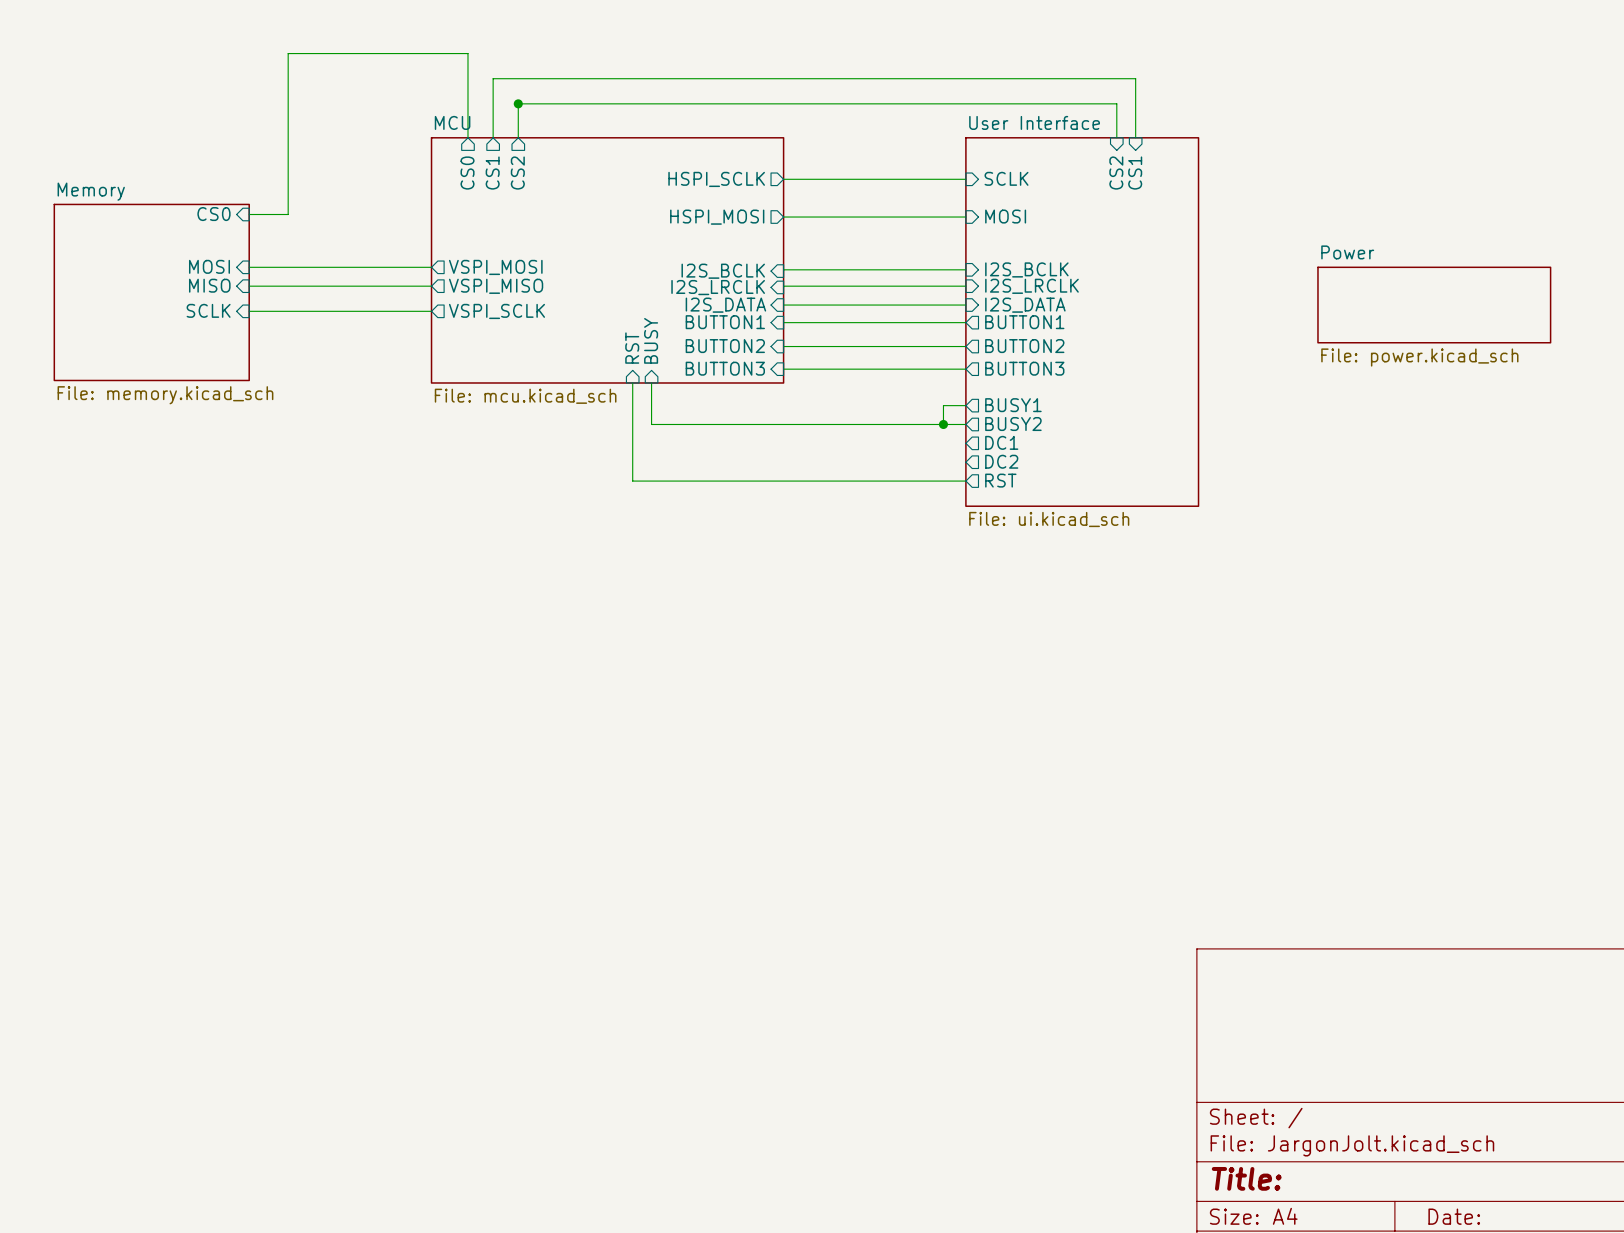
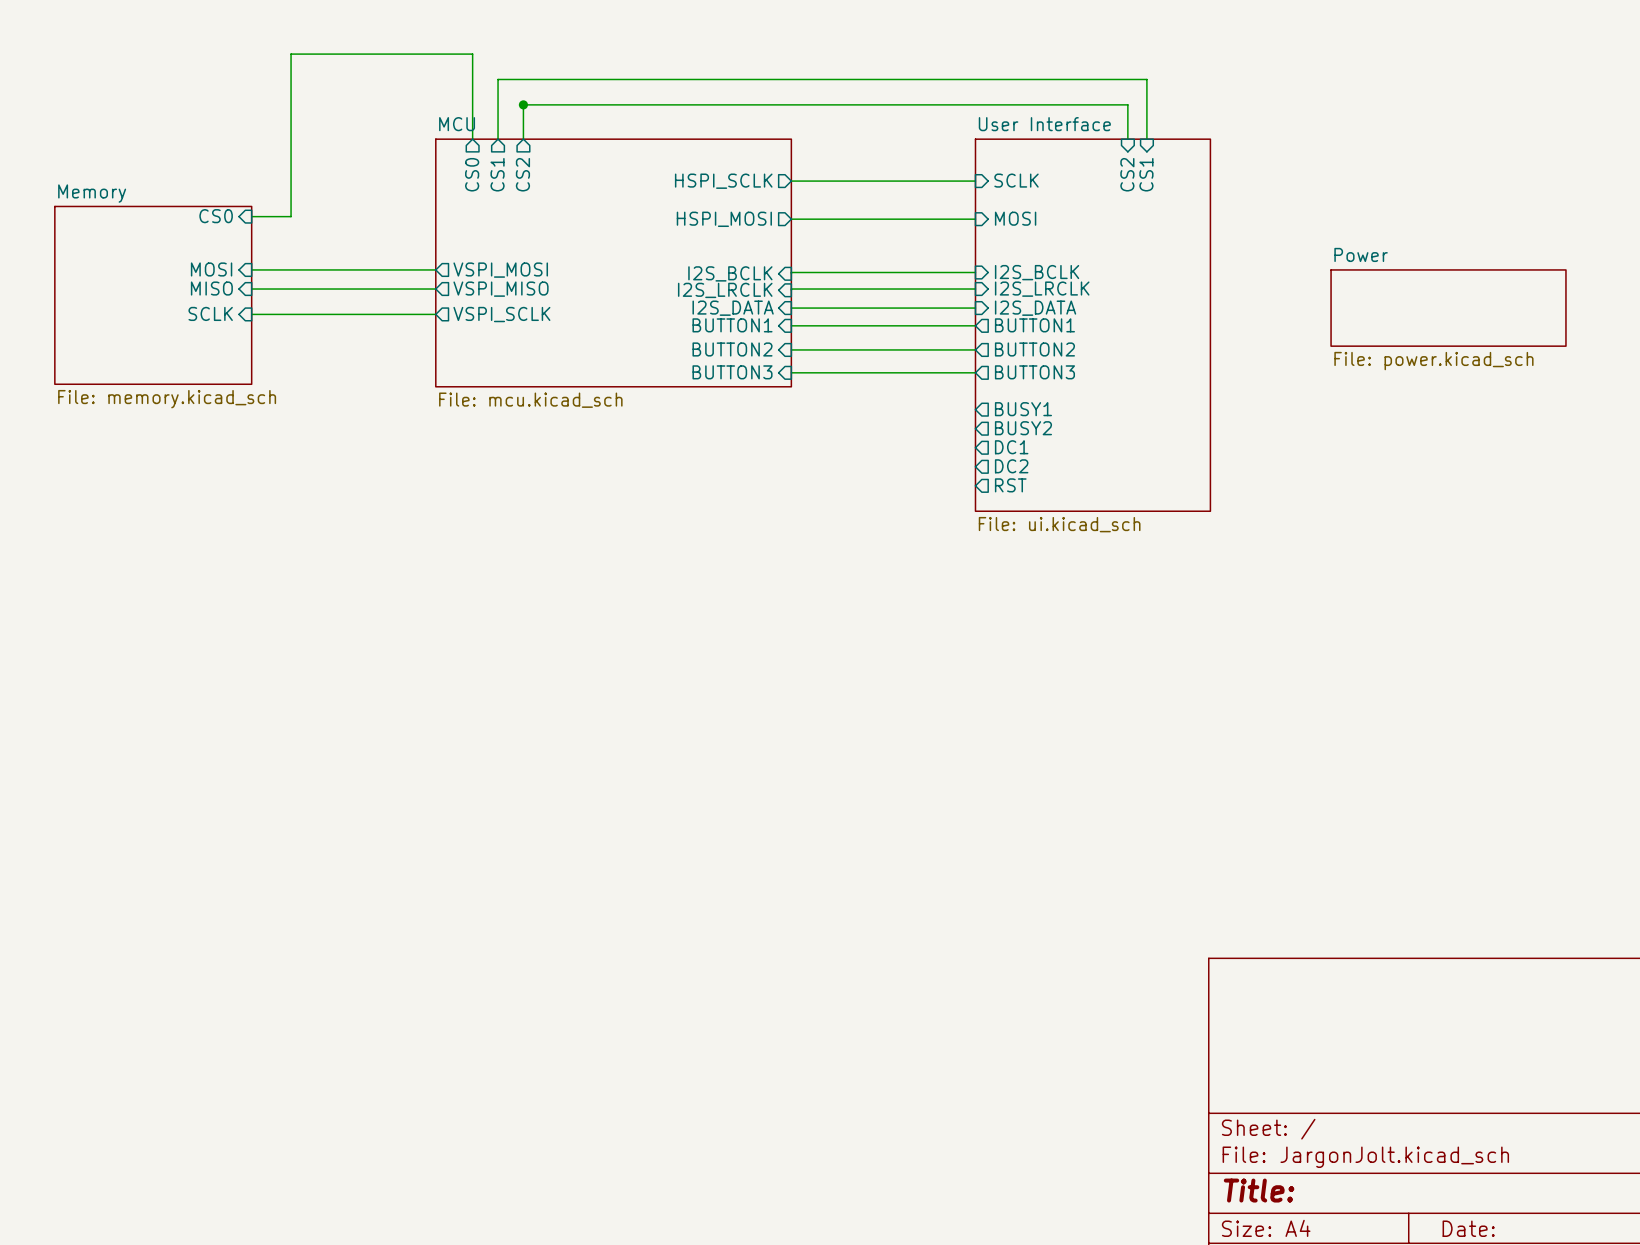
sheet pin: BUSY (651, 340) -> none
sheet pin: RST (632, 348) -> none
wire: (632, 382) (632, 481) (965, 481) -> none
wire: (651, 382) (651, 424) (965, 424) -> none
wire: (965, 405) (943, 405) (943, 424) -> none
junction: (943, 424) -> none

